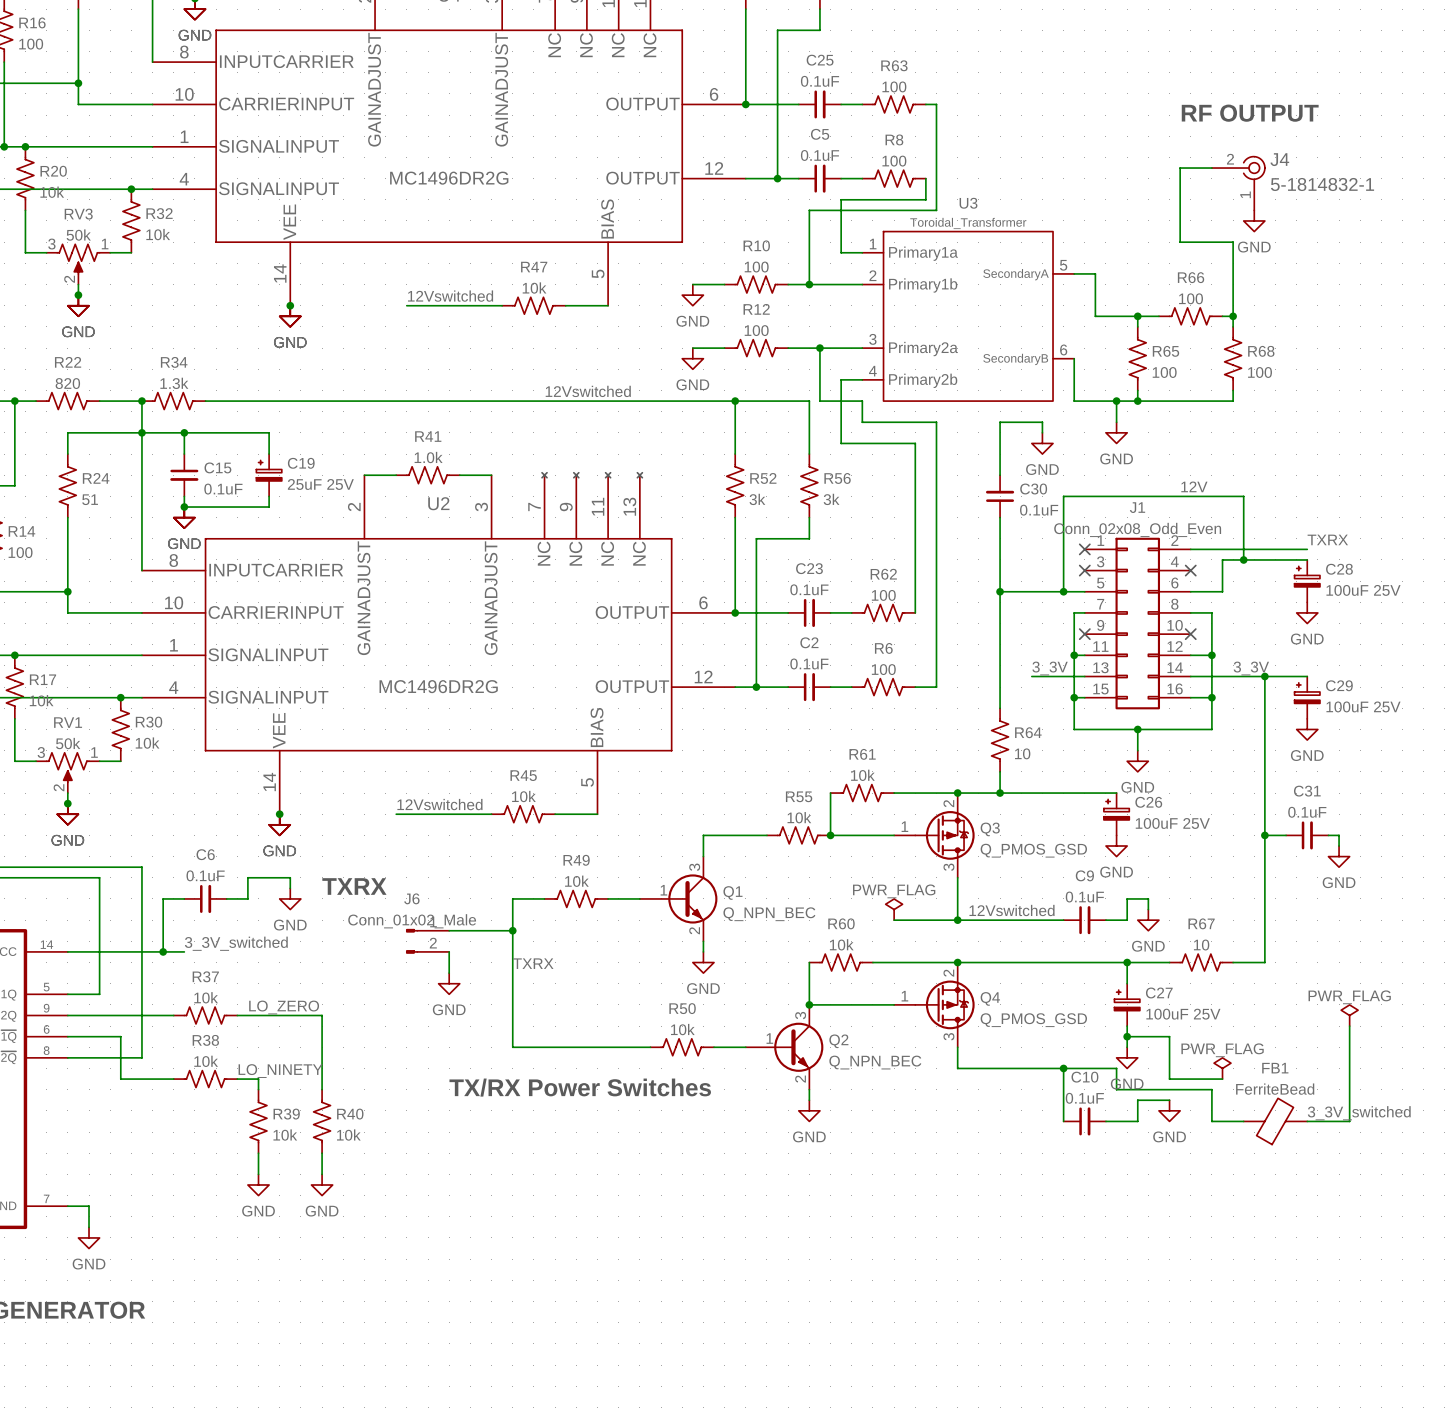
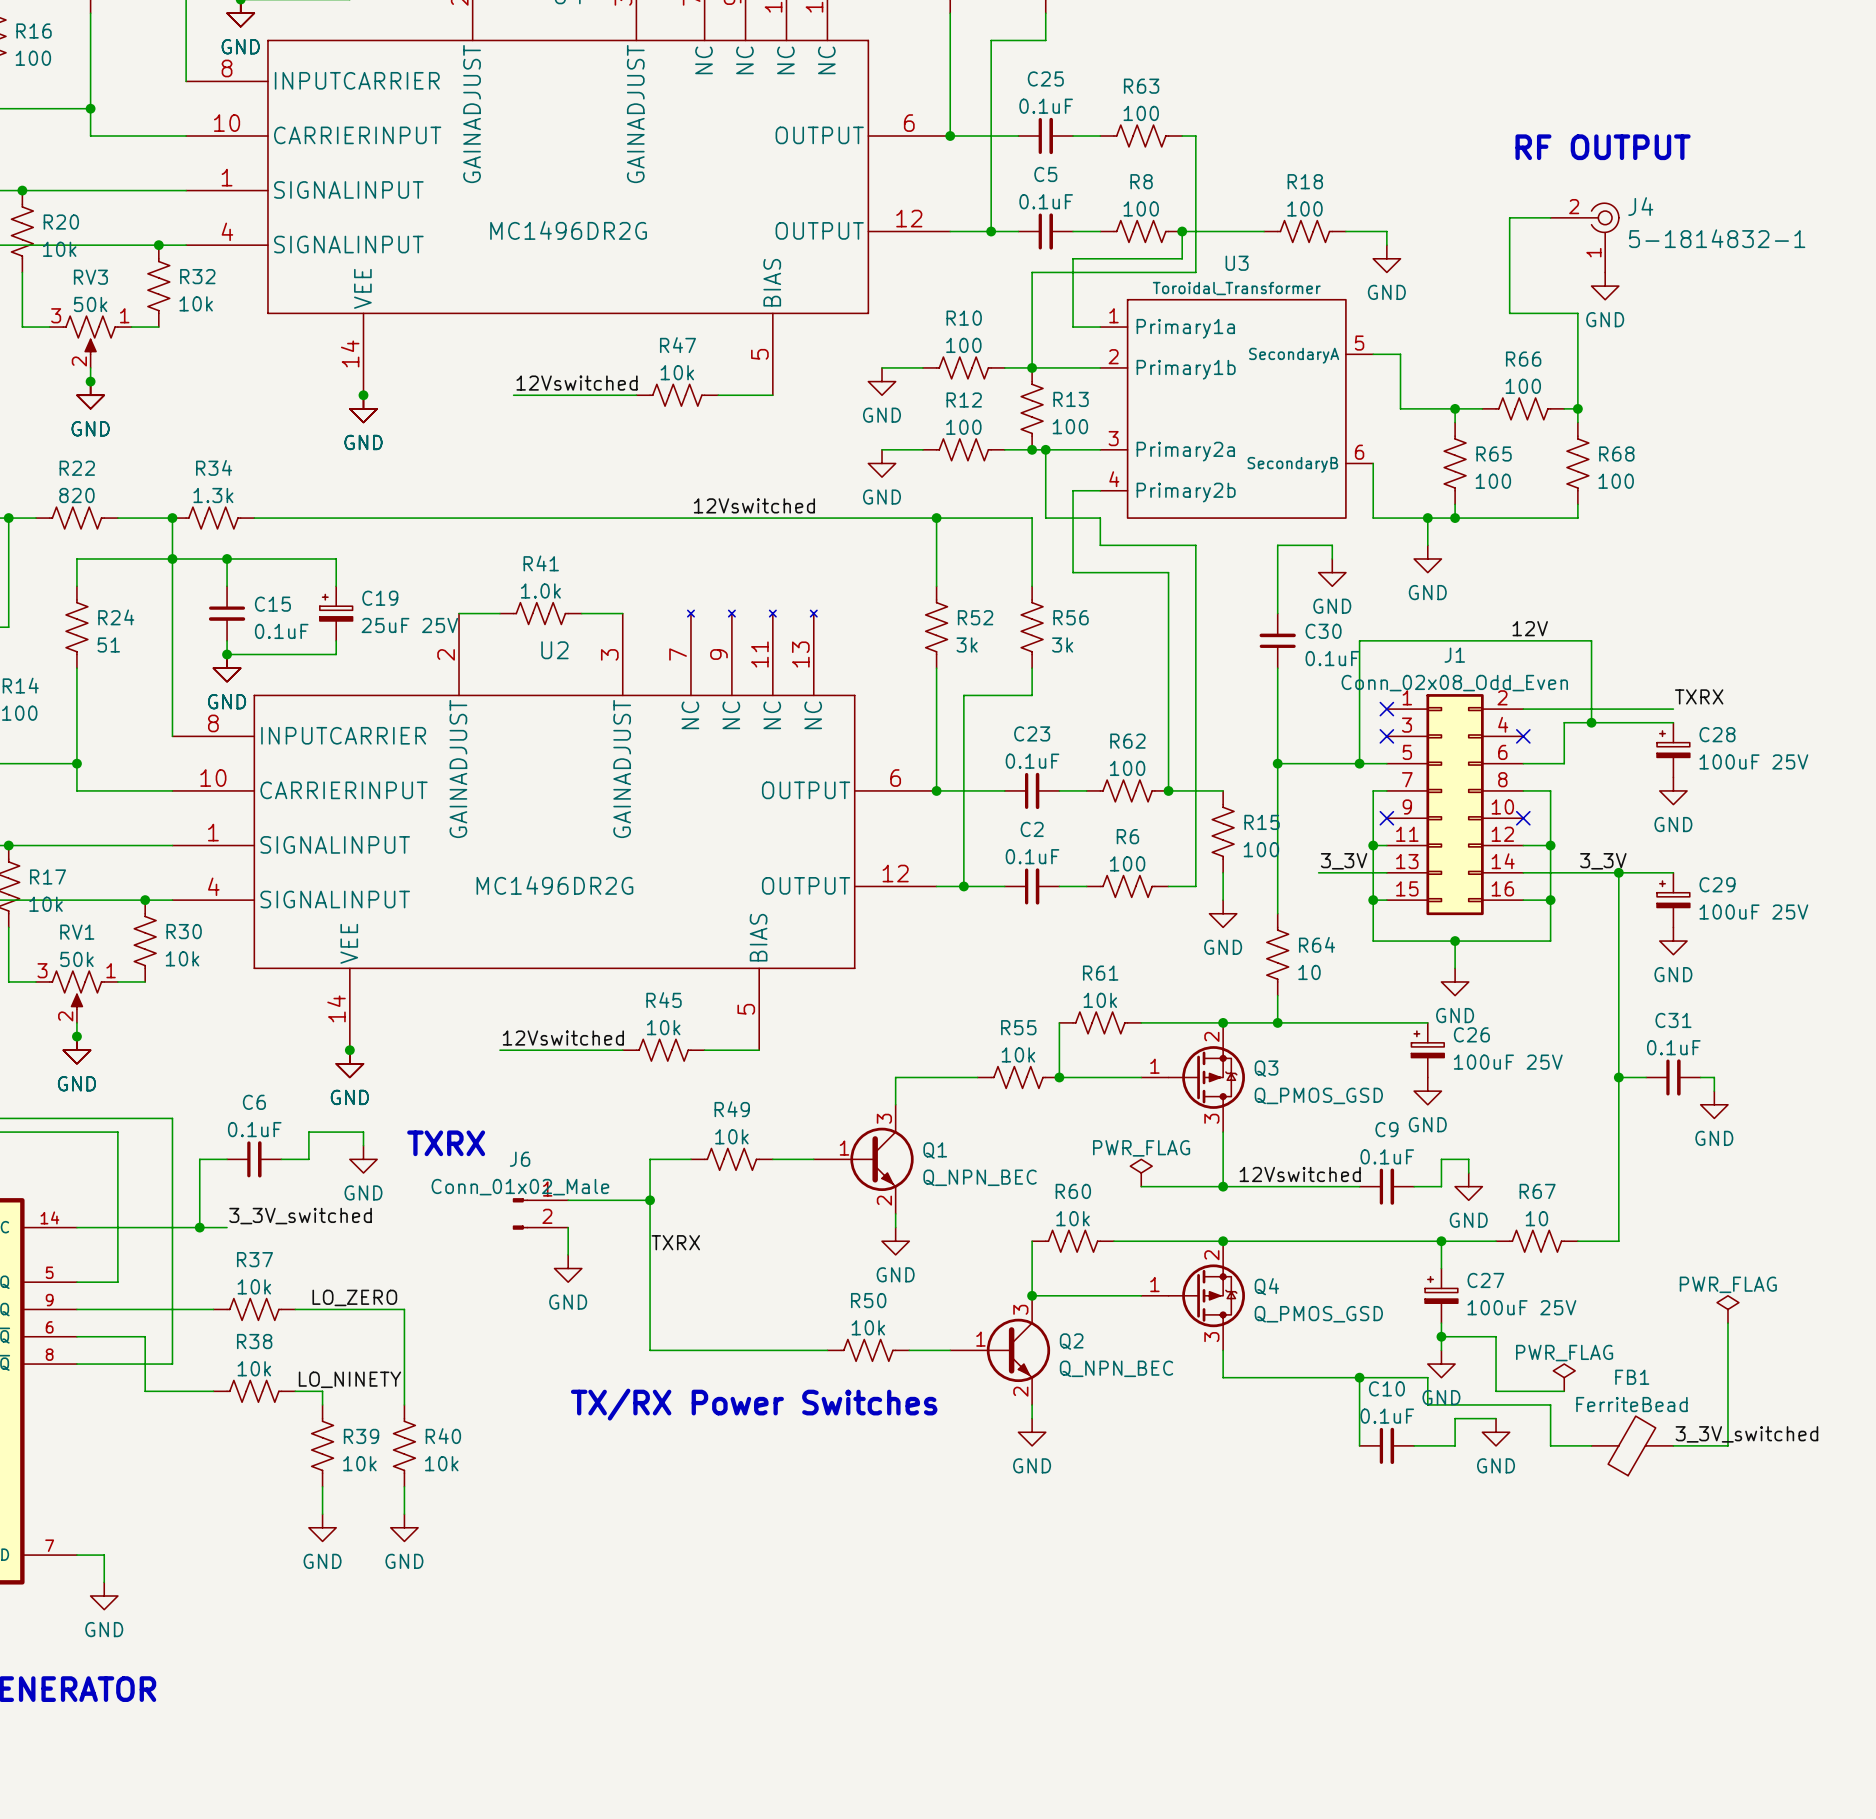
wire: none -> (1182, 231) (1264, 231)
junction: none -> (1182, 231)
R18: none -> 100 (1304, 231)
wire: none -> (1345, 231) (1386, 231) (1386, 245)
power symbol: none -> GND (1386, 258)
R13: none -> 100 (1032, 408)
junction: none -> (1032, 449)
wire: none -> (1168, 790) (1223, 790)
junction: none -> (1168, 790)
R15: none -> 100 (1223, 831)
wire: none -> (1223, 872) (1223, 900)
power symbol: none -> GND (1223, 913)

